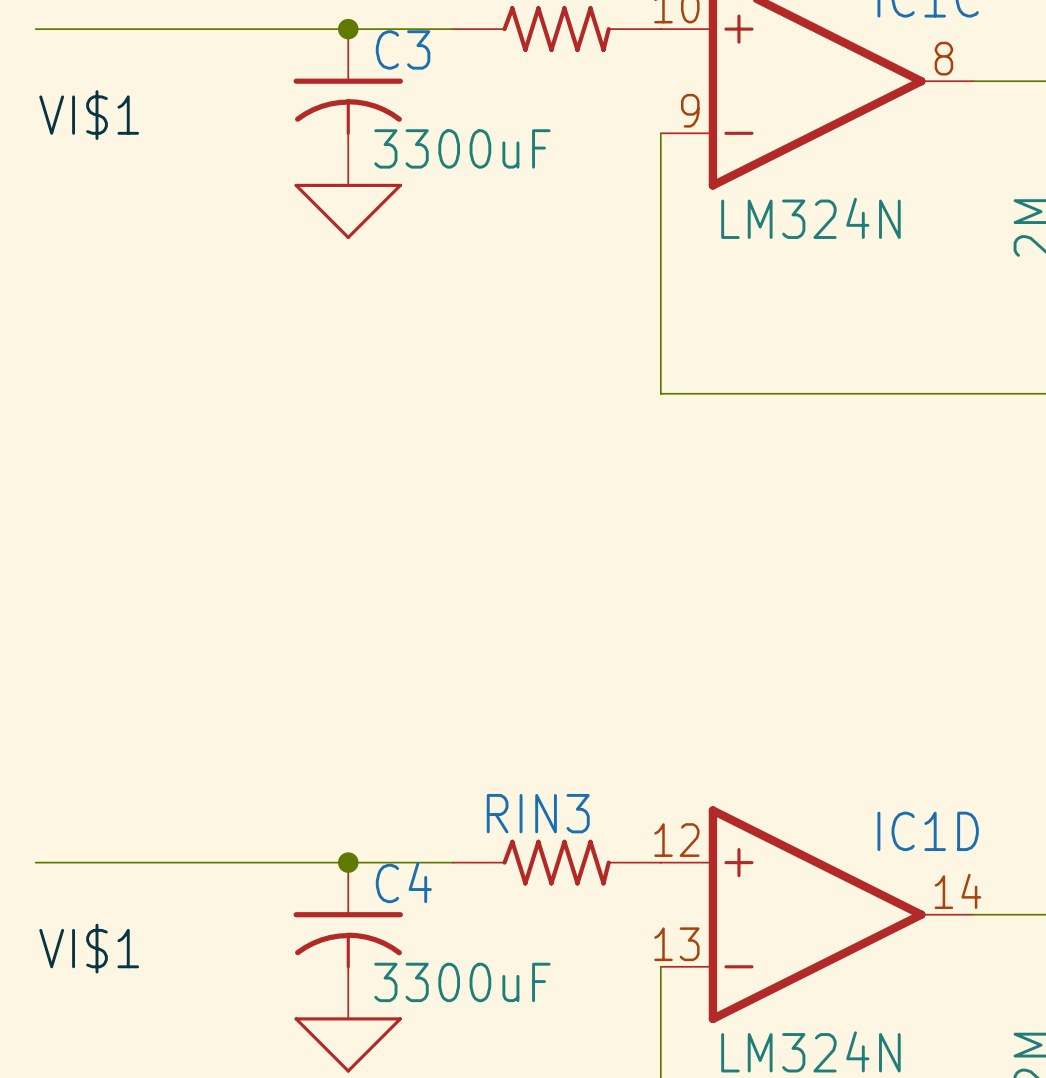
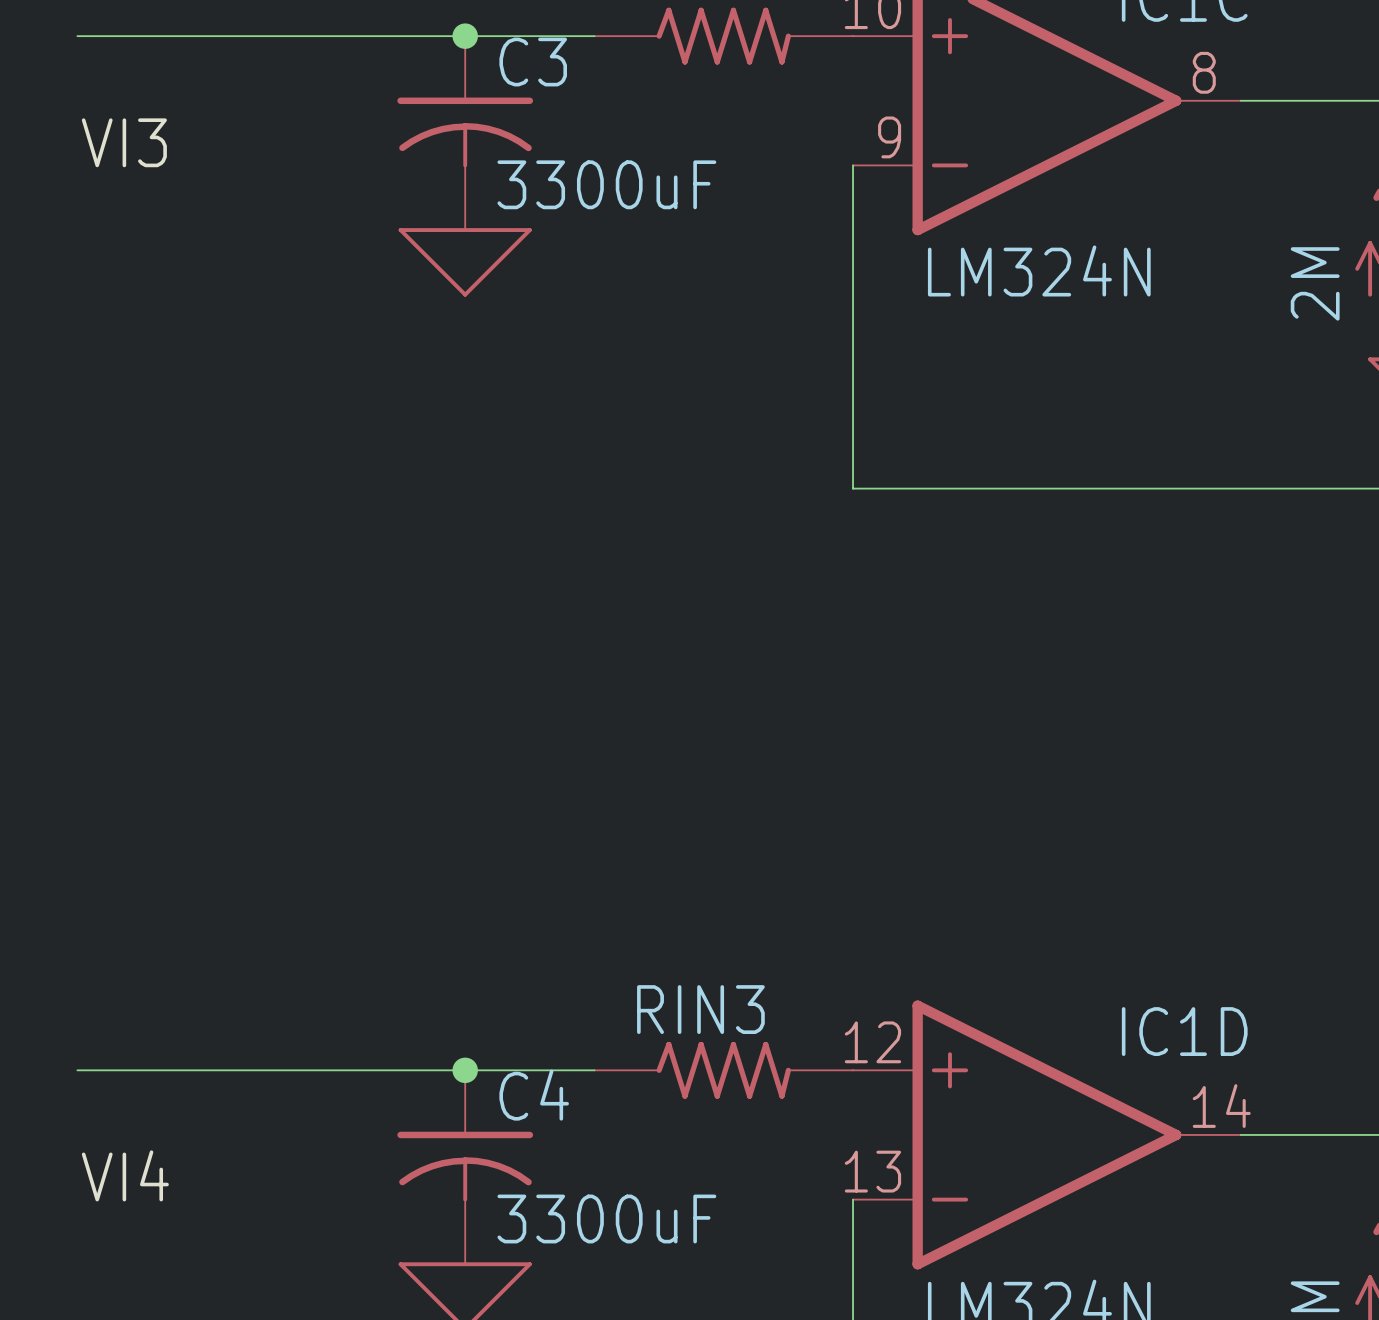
label: VI$1 (89, 115) -> VI3 (124, 142)
label: VI$1 (89, 948) -> VI4 (125, 1175)

